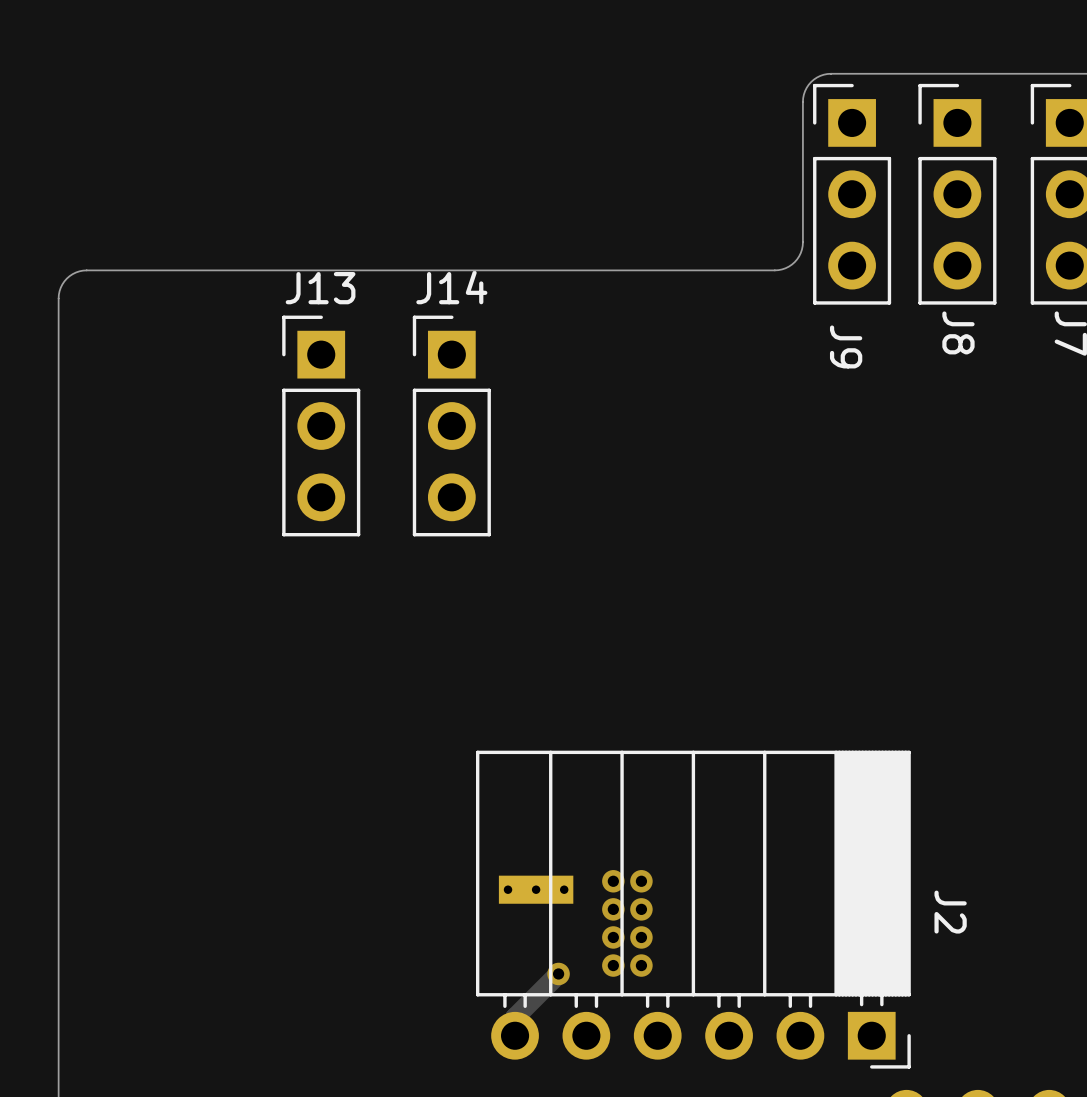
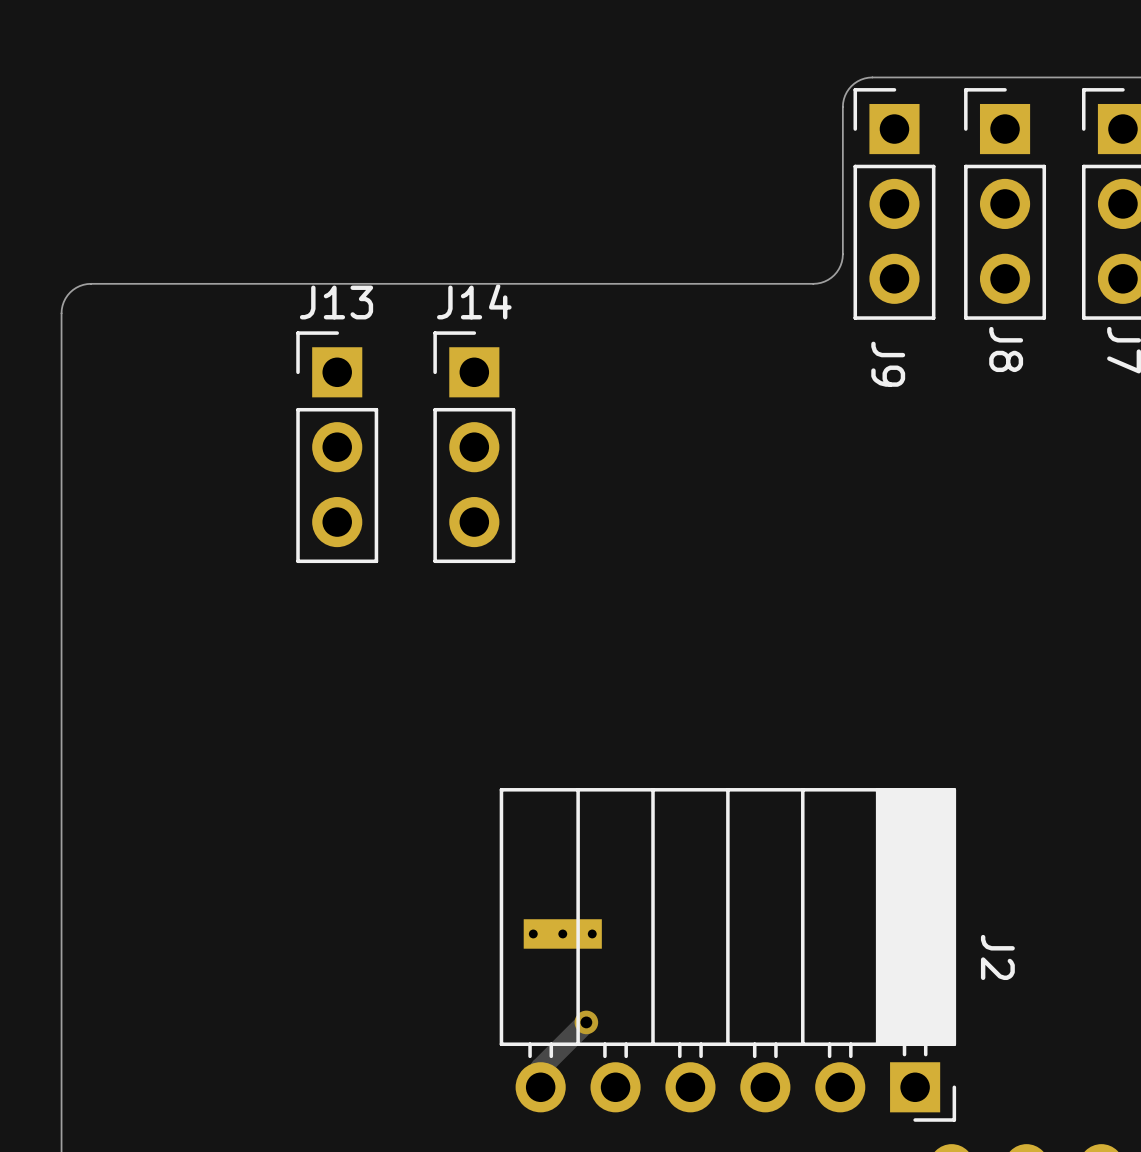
via: (613, 881) -> none
via: (641, 881) -> none
via: (613, 909) -> none
via: (641, 909) -> none
via: (613, 937) -> none
via: (641, 937) -> none
via: (613, 965) -> none
via: (641, 965) -> none

